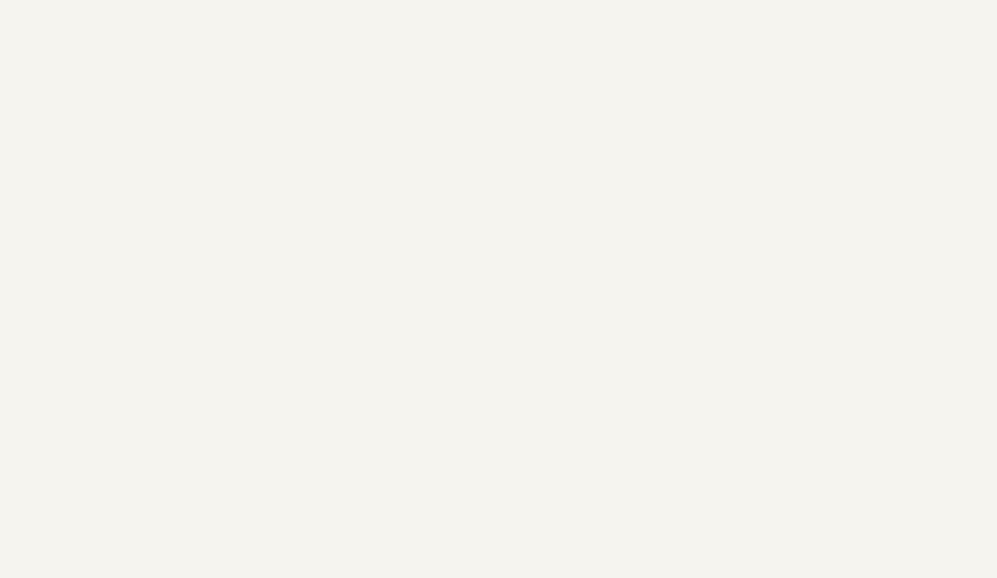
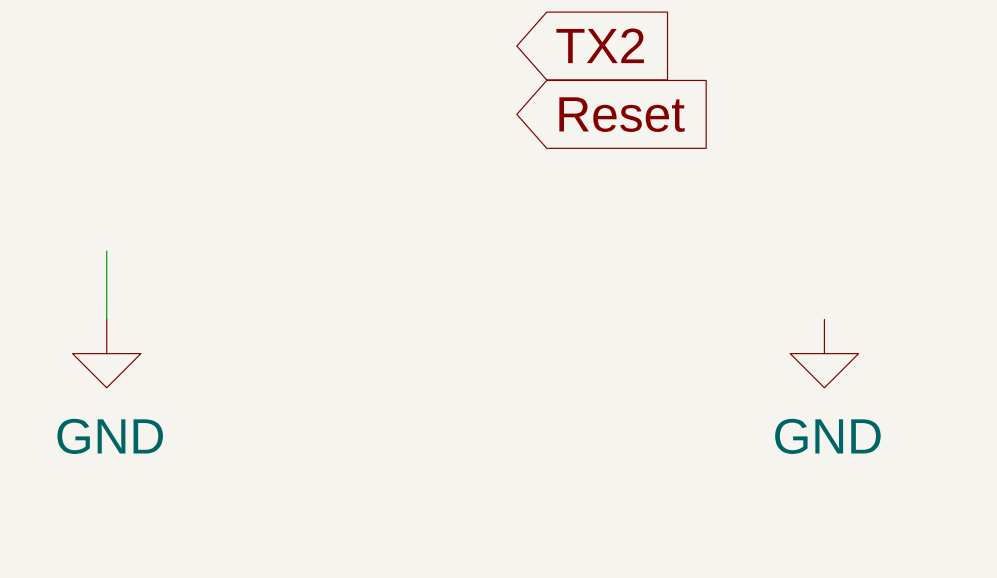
global label: none -> TX2 (600, 45)
global label: none -> Reset (622, 114)
wire: none -> (106, 251) (106, 319)
power symbol: none -> GND (106, 353)
power symbol: none -> GND (824, 353)

